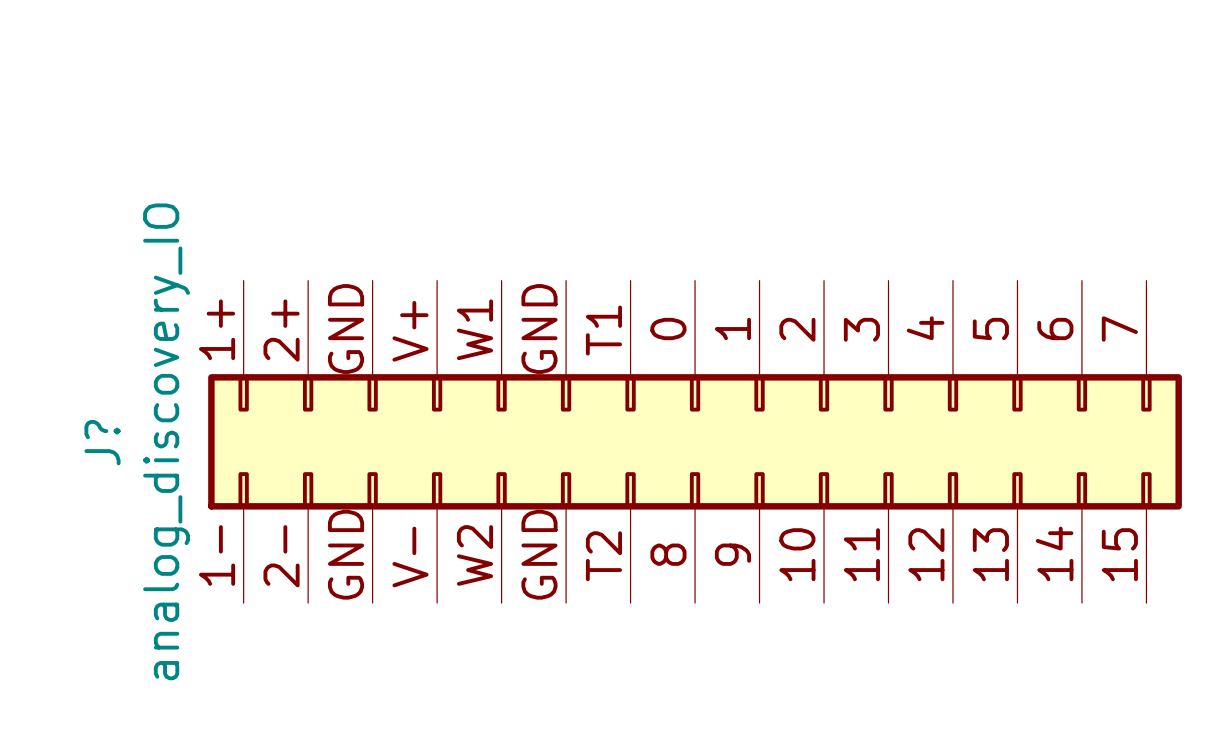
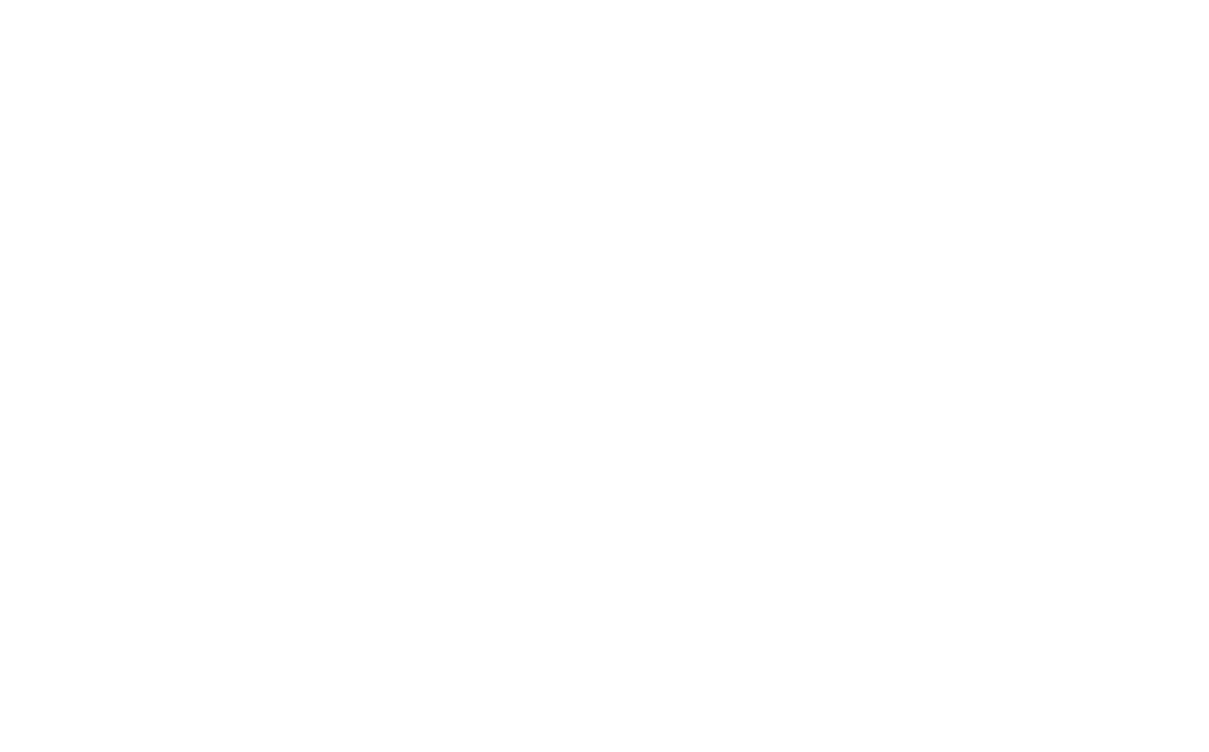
J?: analog_discovery_IO (695, 441) -> none

